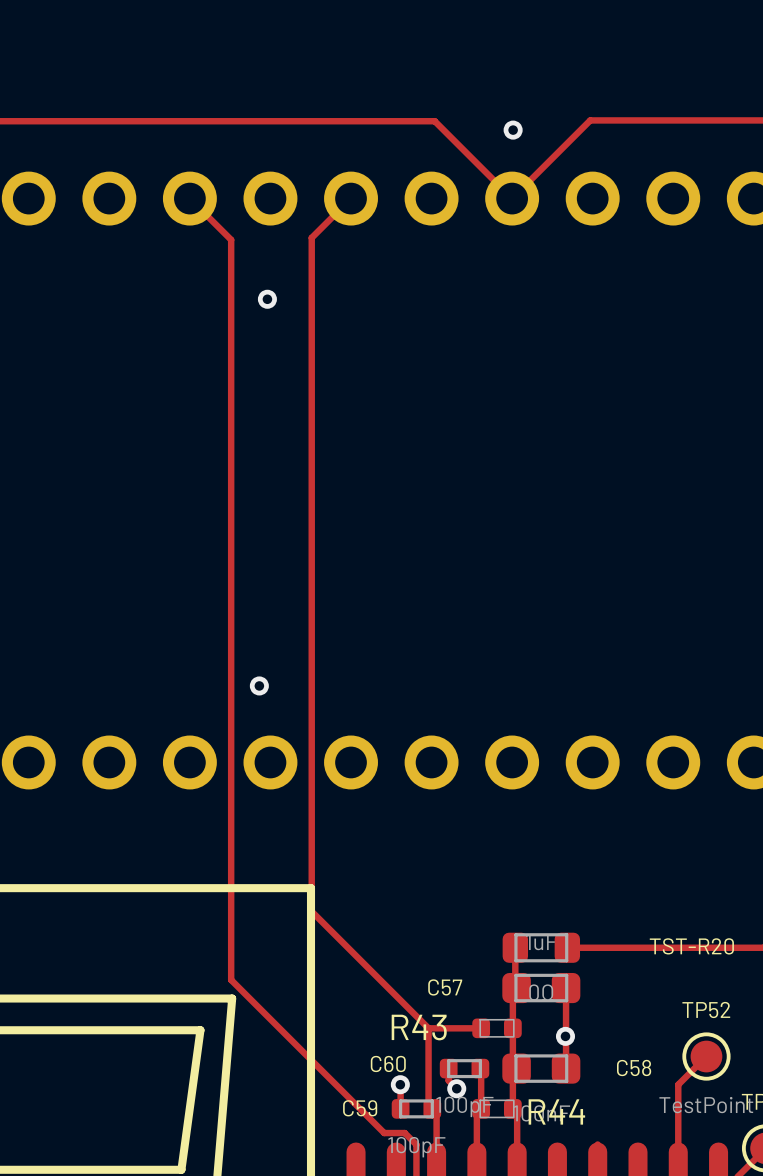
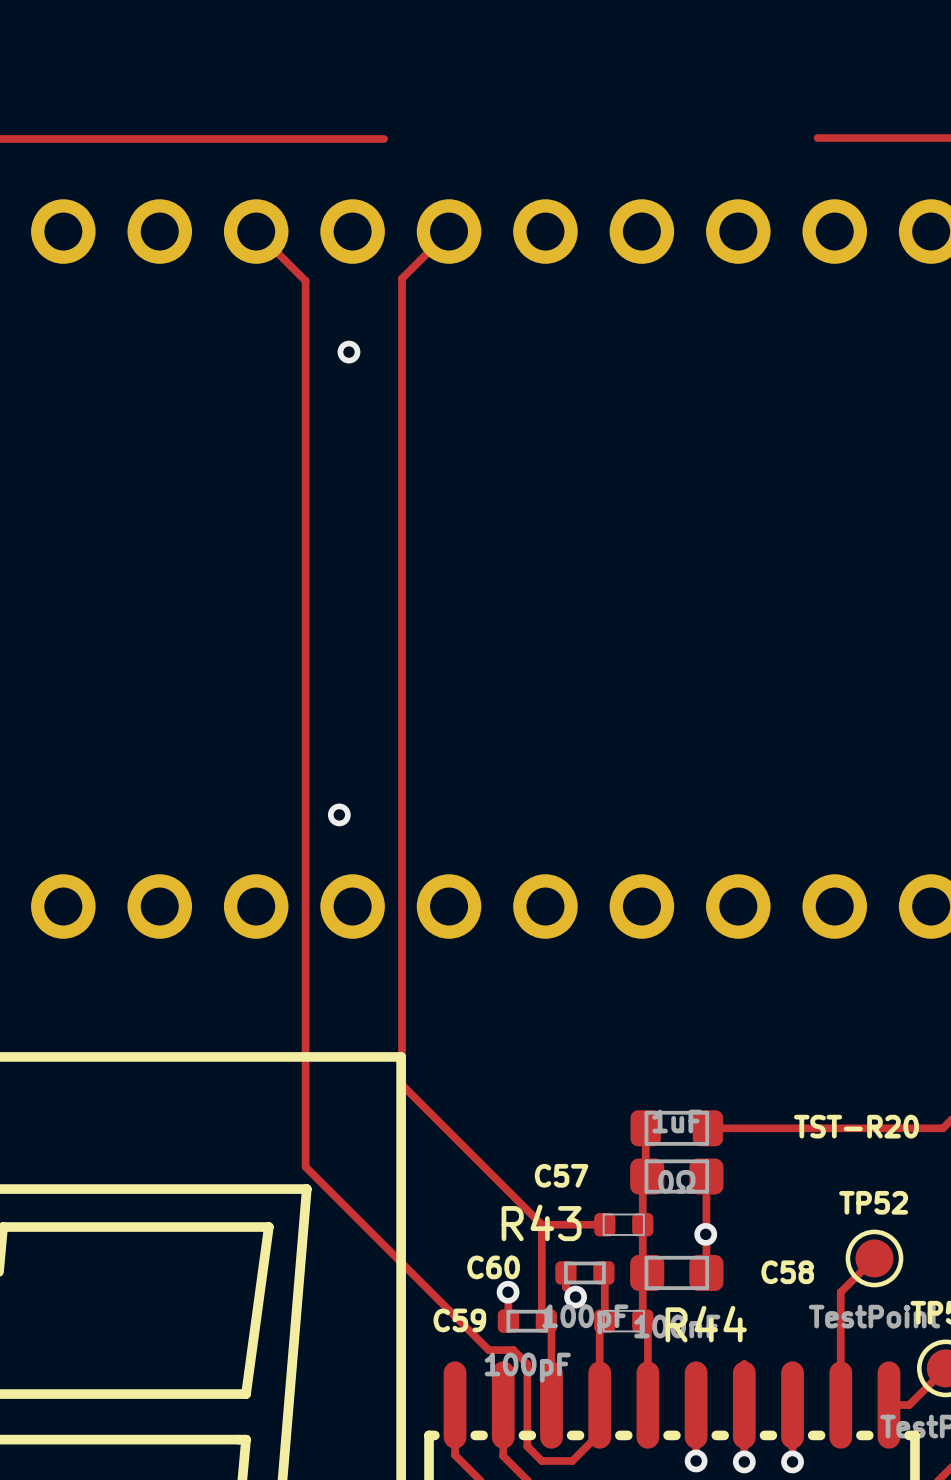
track: (658, 120) (590, 120) (512, 198) (434, 121) (296, 121) -> none
via: (513, 130) -> none

